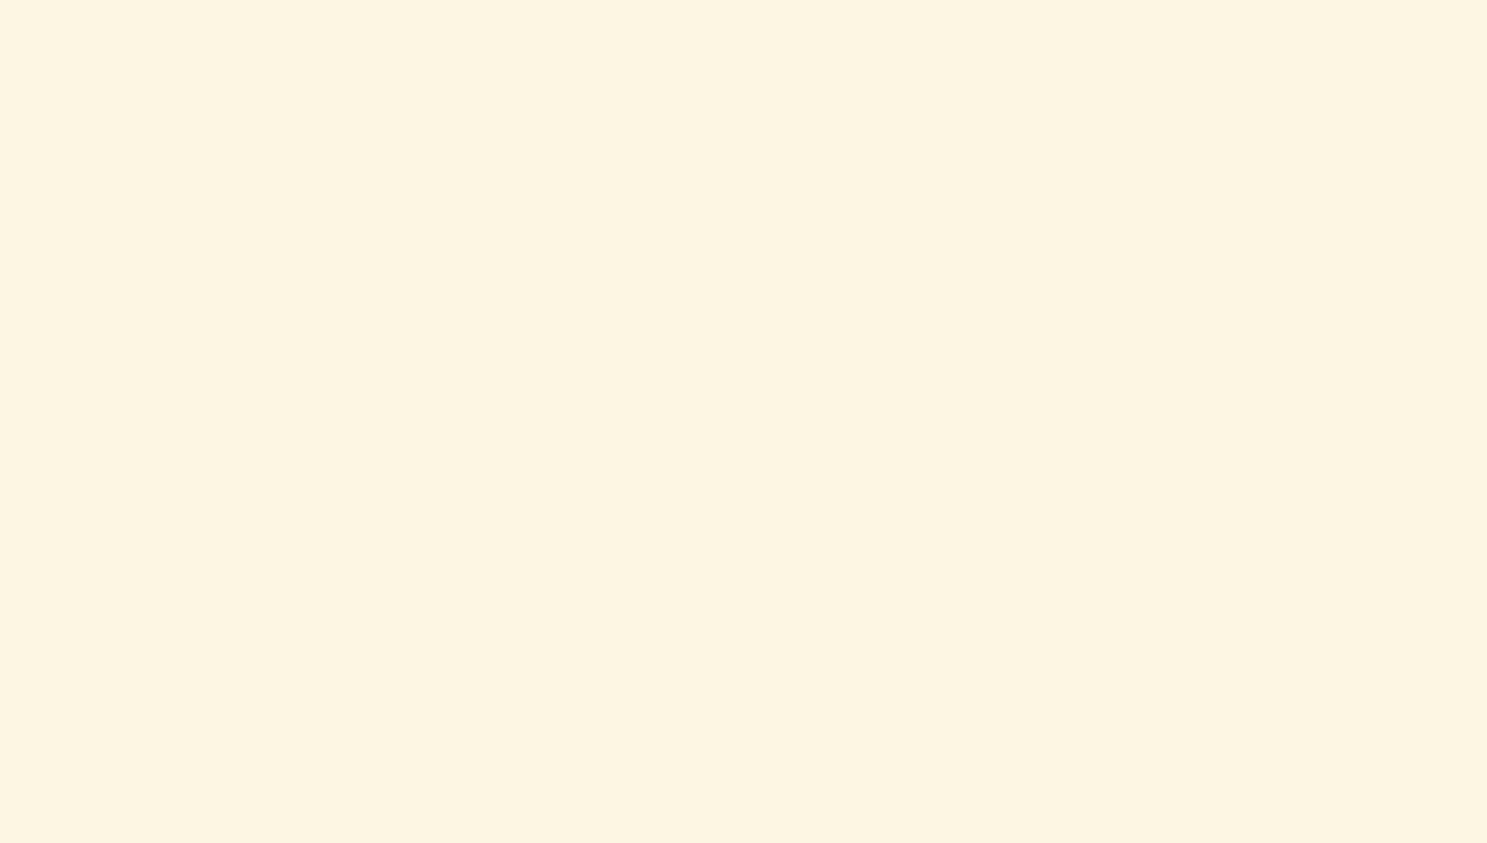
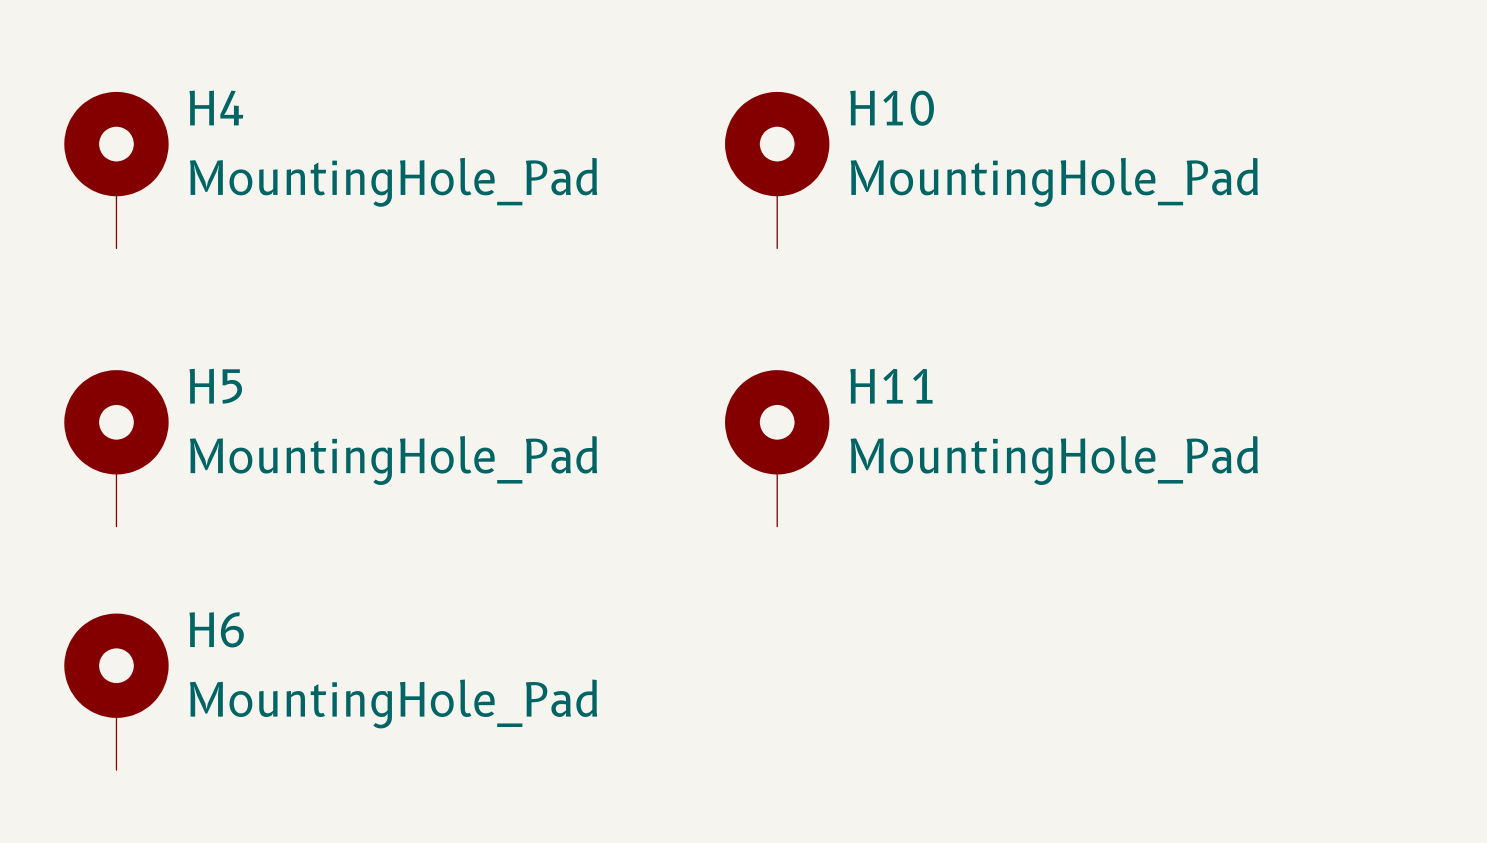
H4: none -> MountingHole_Pad (116, 170)
H10: none -> MountingHole_Pad (777, 170)
H5: none -> MountingHole_Pad (116, 448)
H11: none -> MountingHole_Pad (777, 448)
H6: none -> MountingHole_Pad (116, 691)

